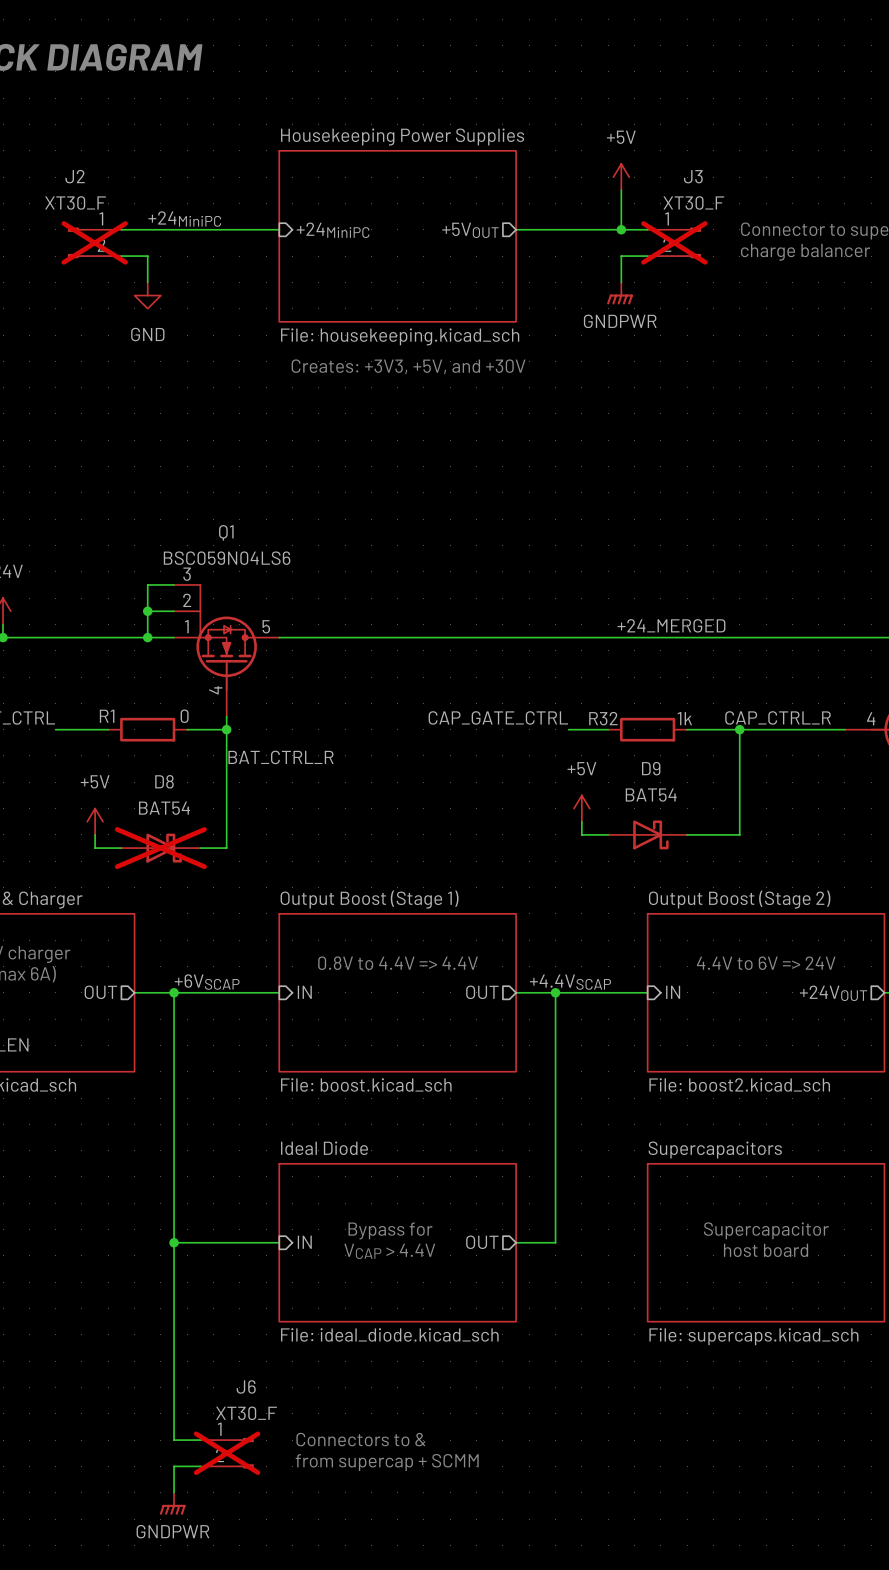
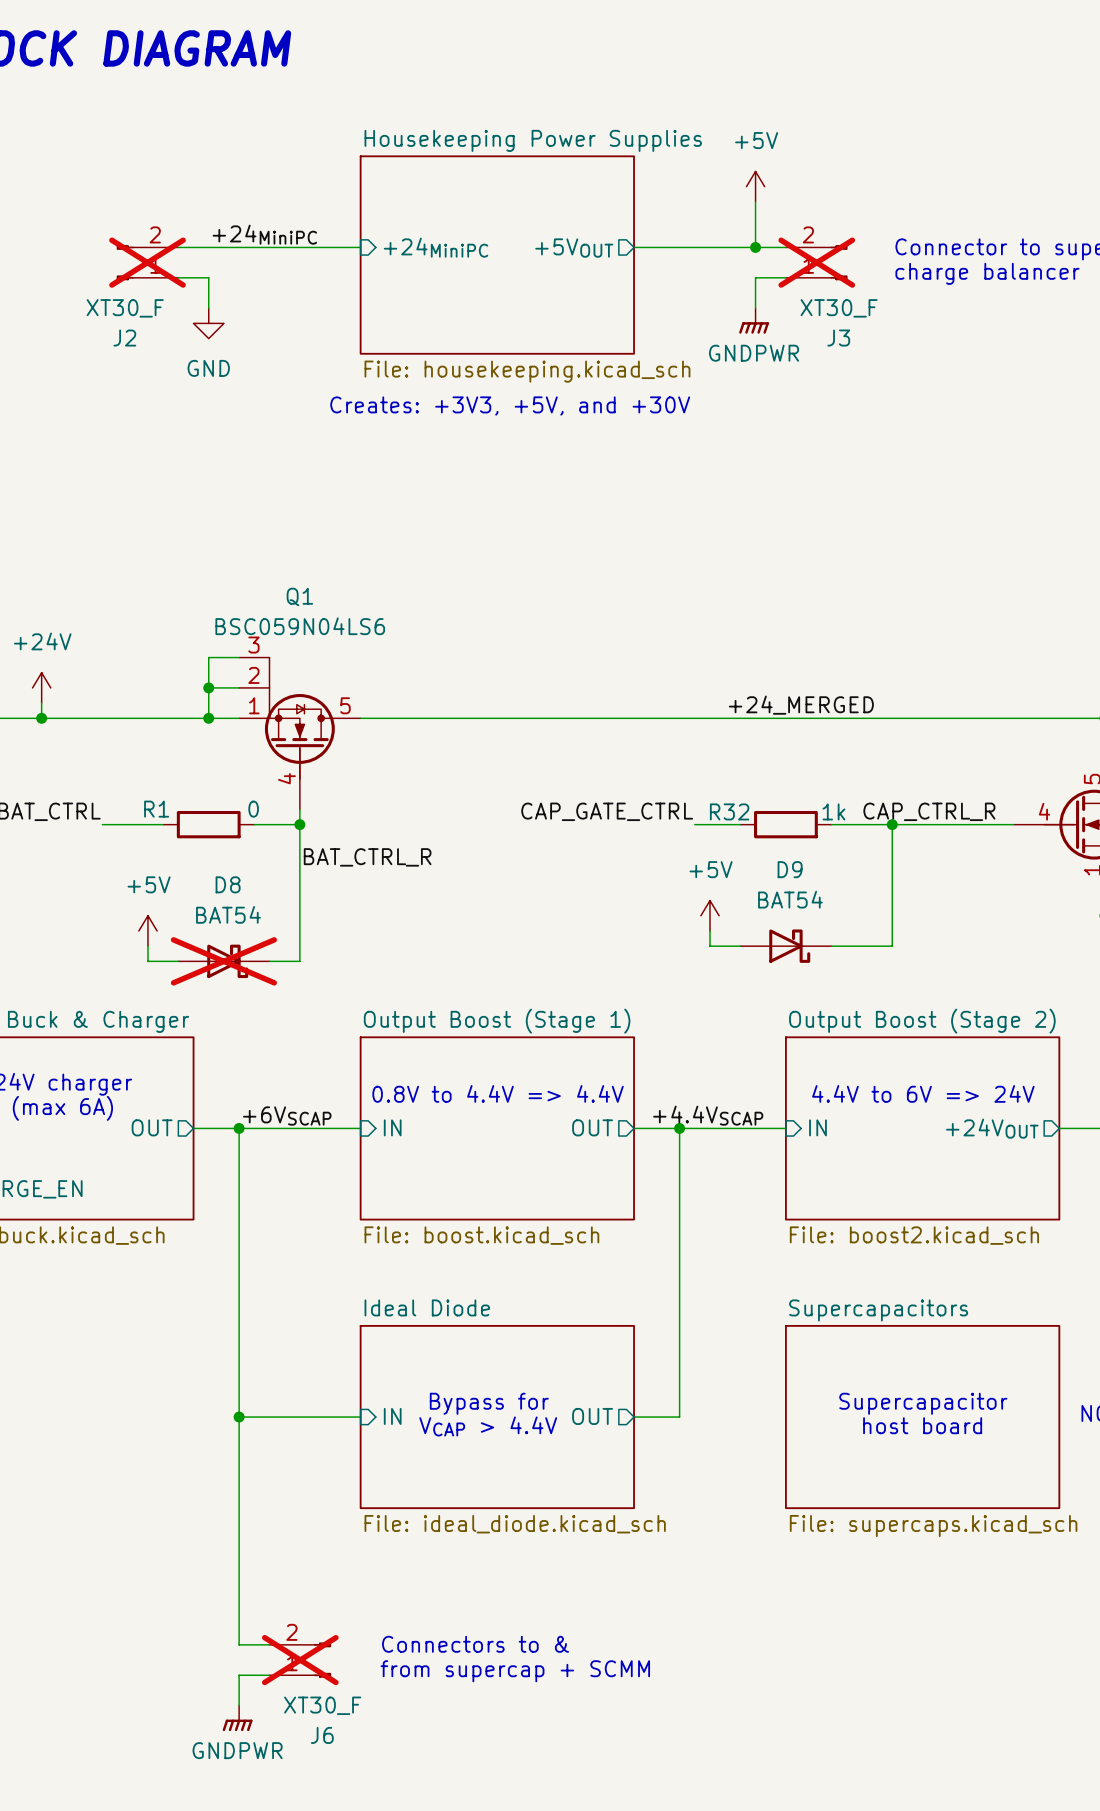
J2 flip: as is (75, 242) -> up-down (125, 262)
J3 flip: as is (693, 242) -> up-down (839, 262)
J6 flip: as is (246, 1453) -> up-down (322, 1660)

